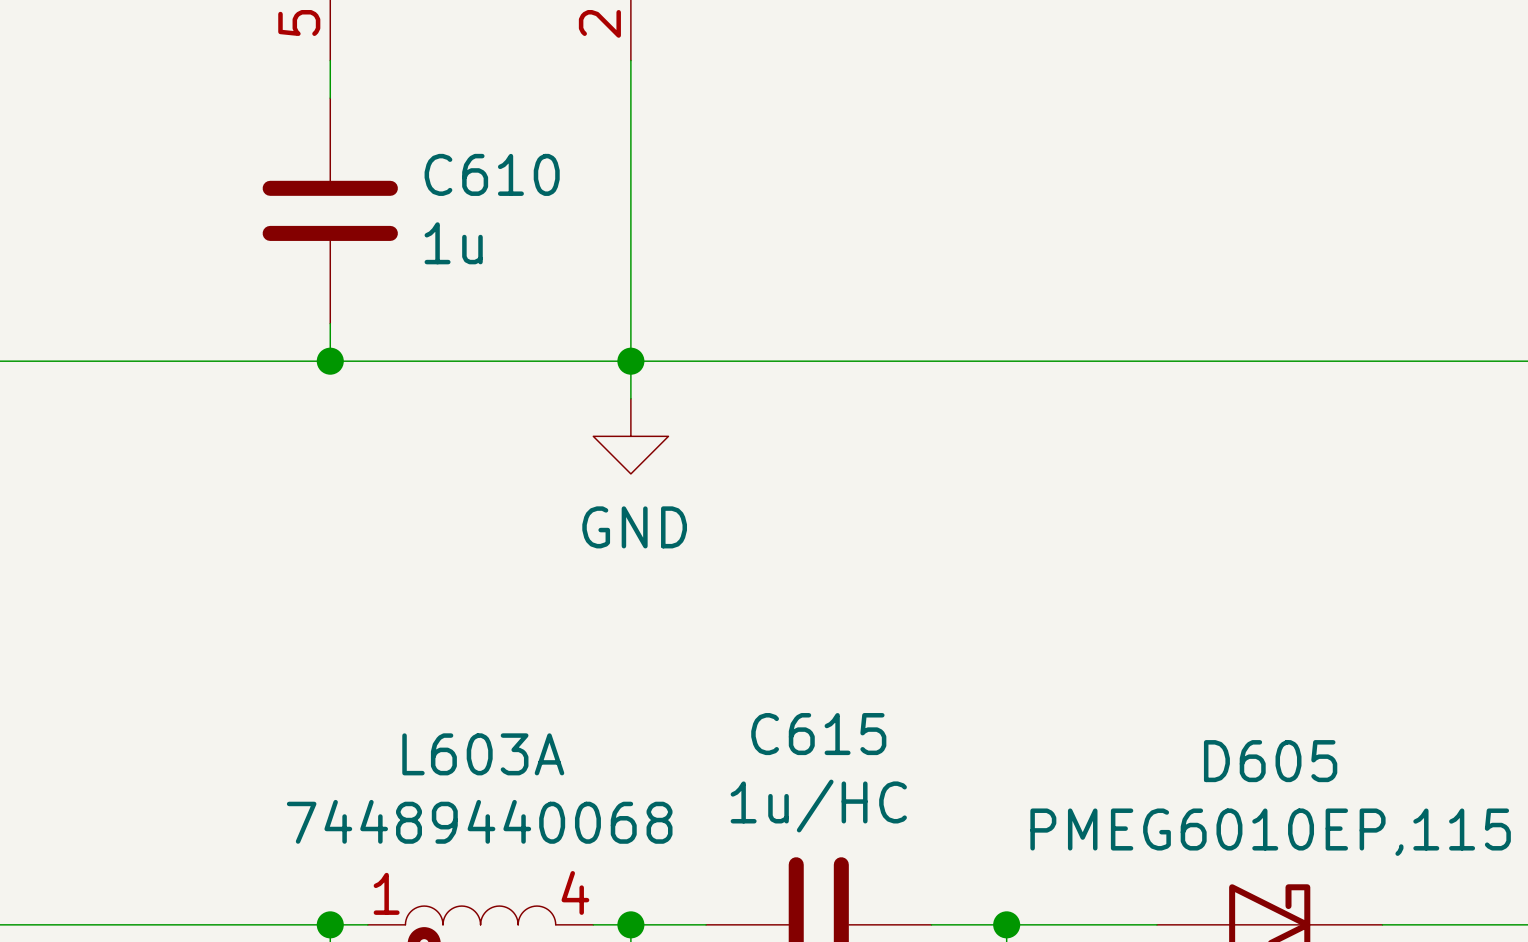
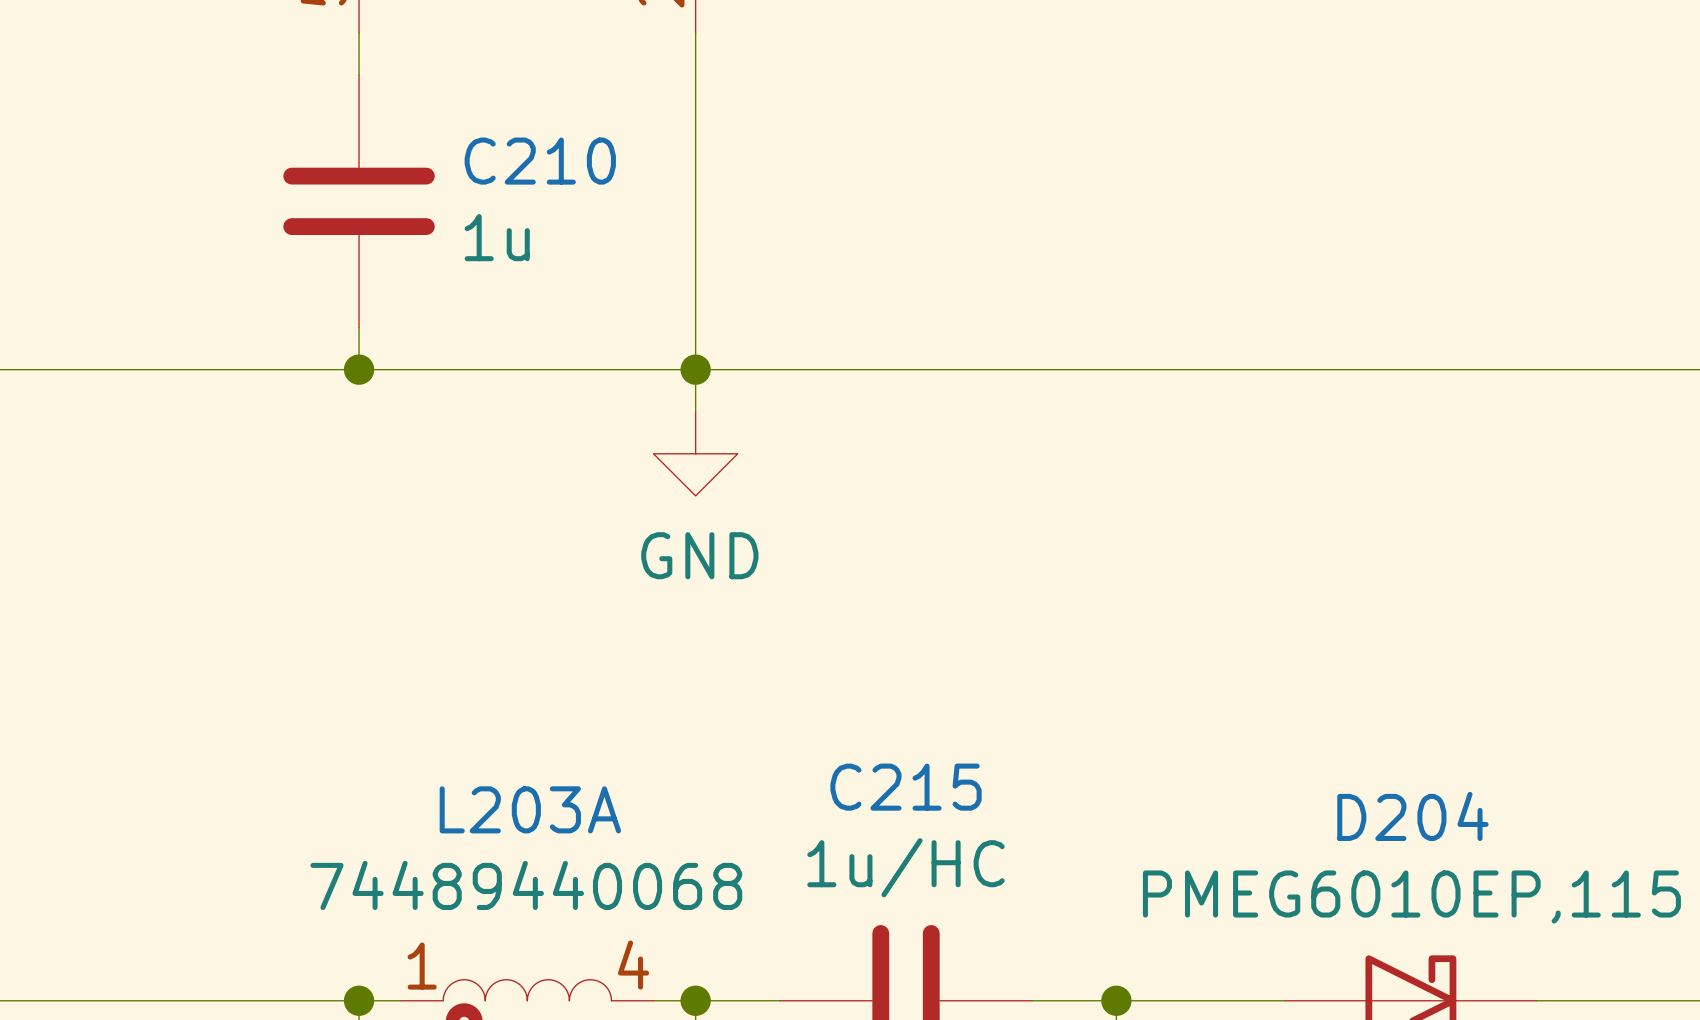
C610 name: C610 (492, 174) -> C210 (540, 161)
C615 name: C615 (818, 734) -> C215 (906, 787)
L603A name: L603A (483, 754) -> L203A (530, 809)
D605 name: D605 (1270, 761) -> D204 (1412, 816)

